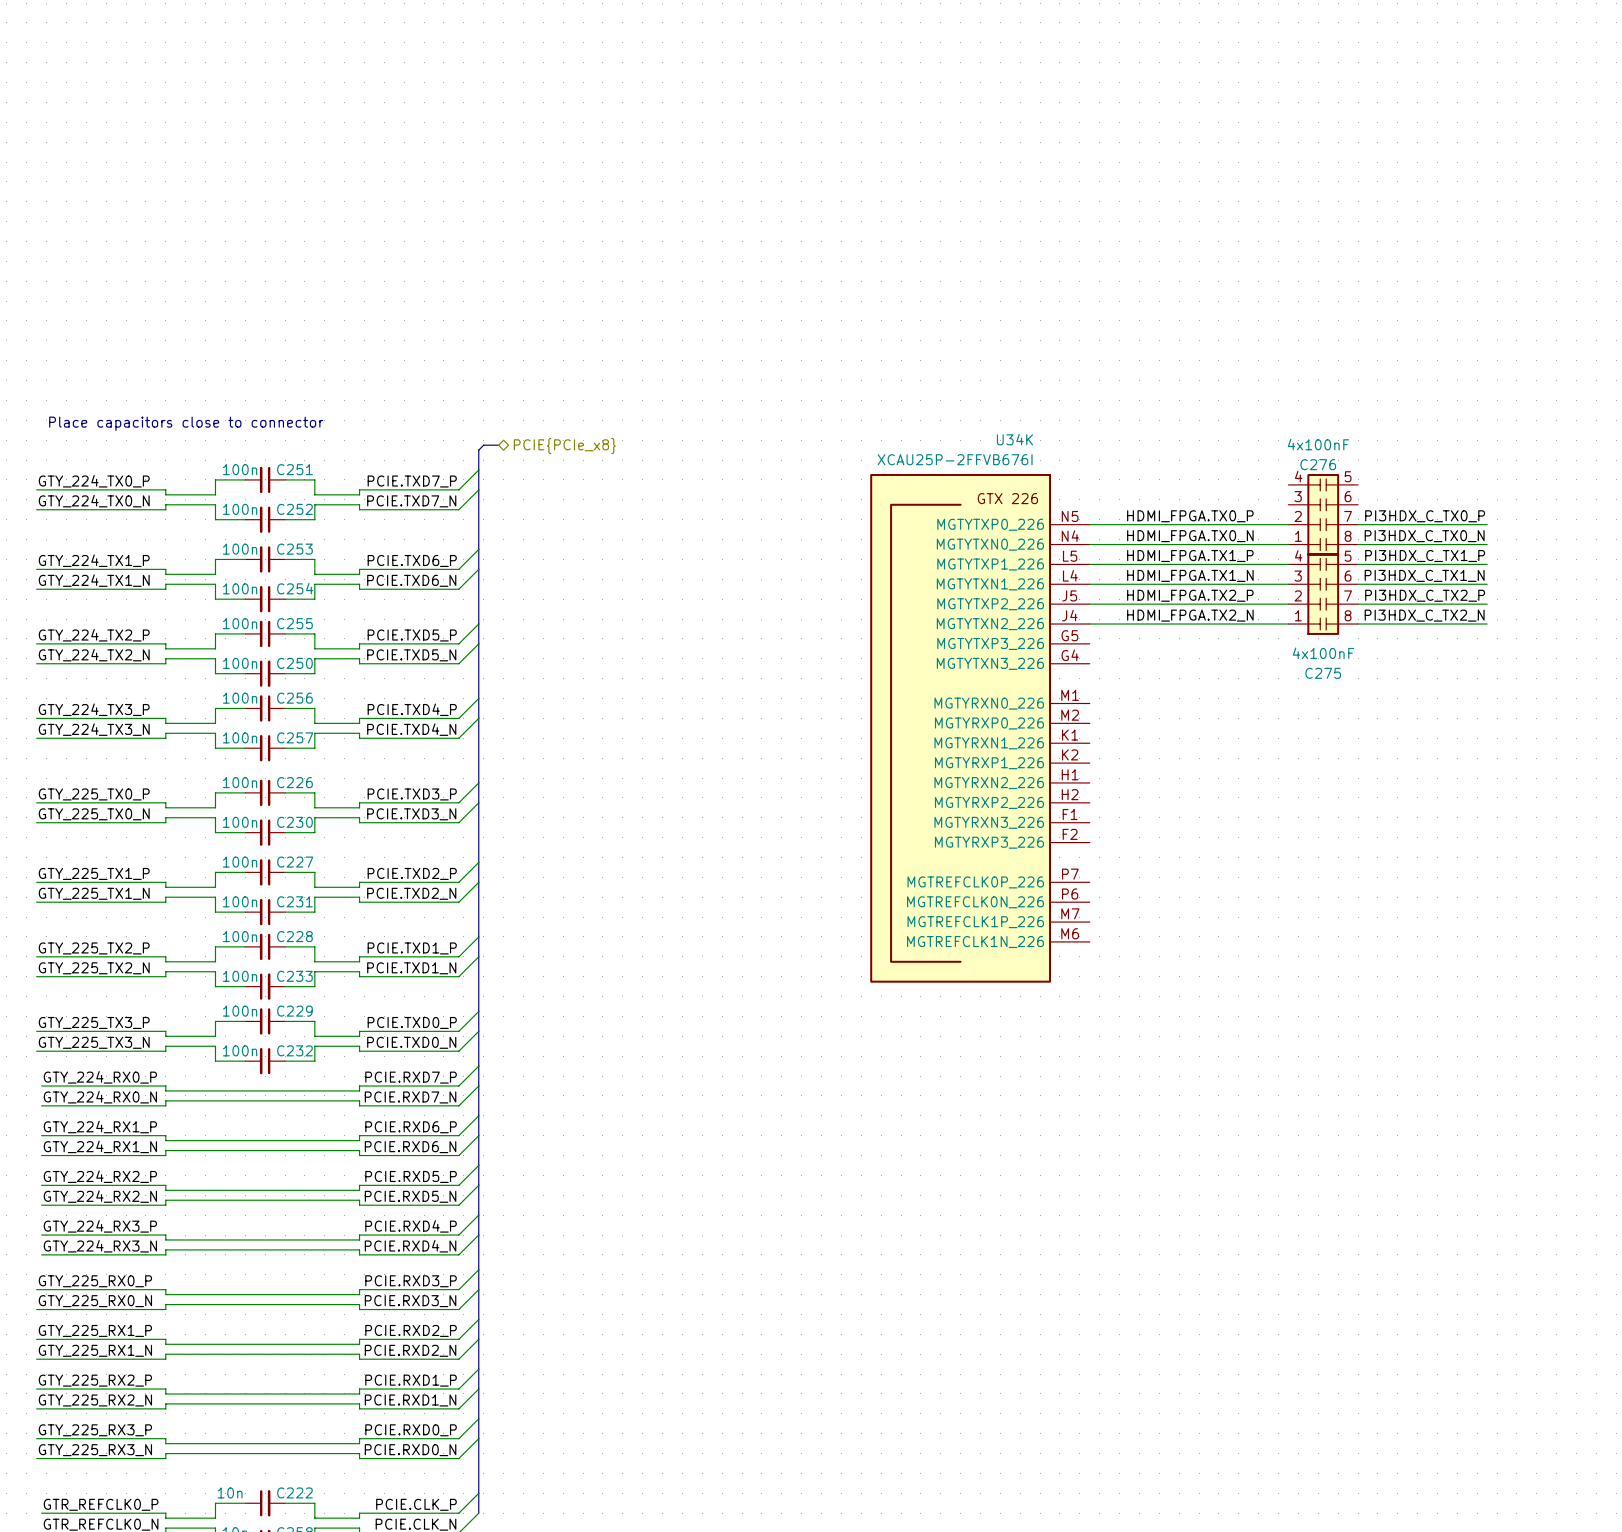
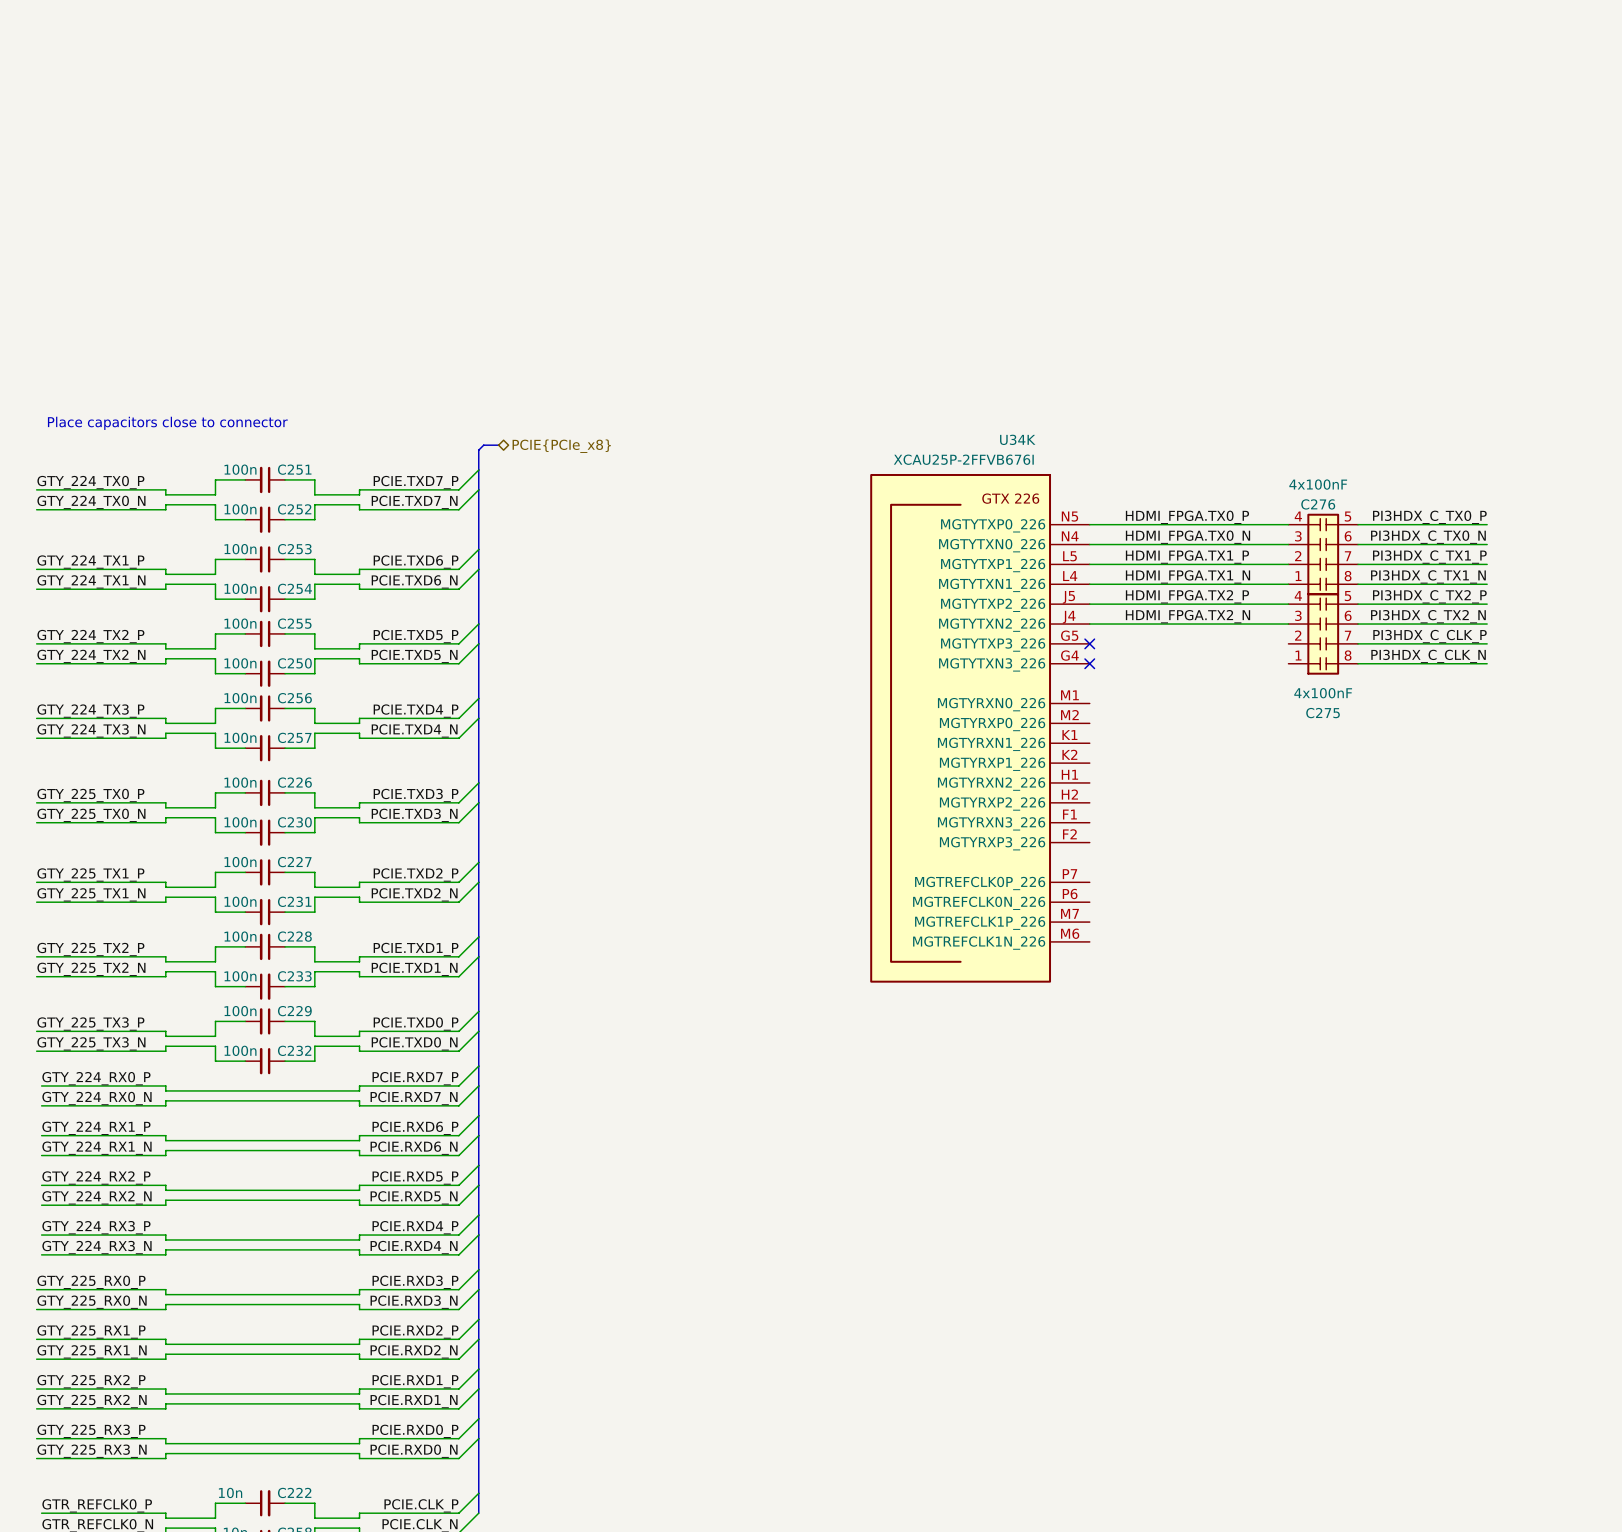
C276 position: (1323, 514) -> (1323, 554)
C275 position: (1323, 594) -> (1323, 633)
label: none -> PI3HDX_C_CLK_P (1430, 636)
no-connect mark: none -> (1089, 643)
wire: none -> (1358, 643) (1487, 643)
label: none -> PI3HDX_C_CLK_N (1428, 656)
no-connect mark: none -> (1089, 663)
wire: none -> (1358, 663) (1487, 663)

